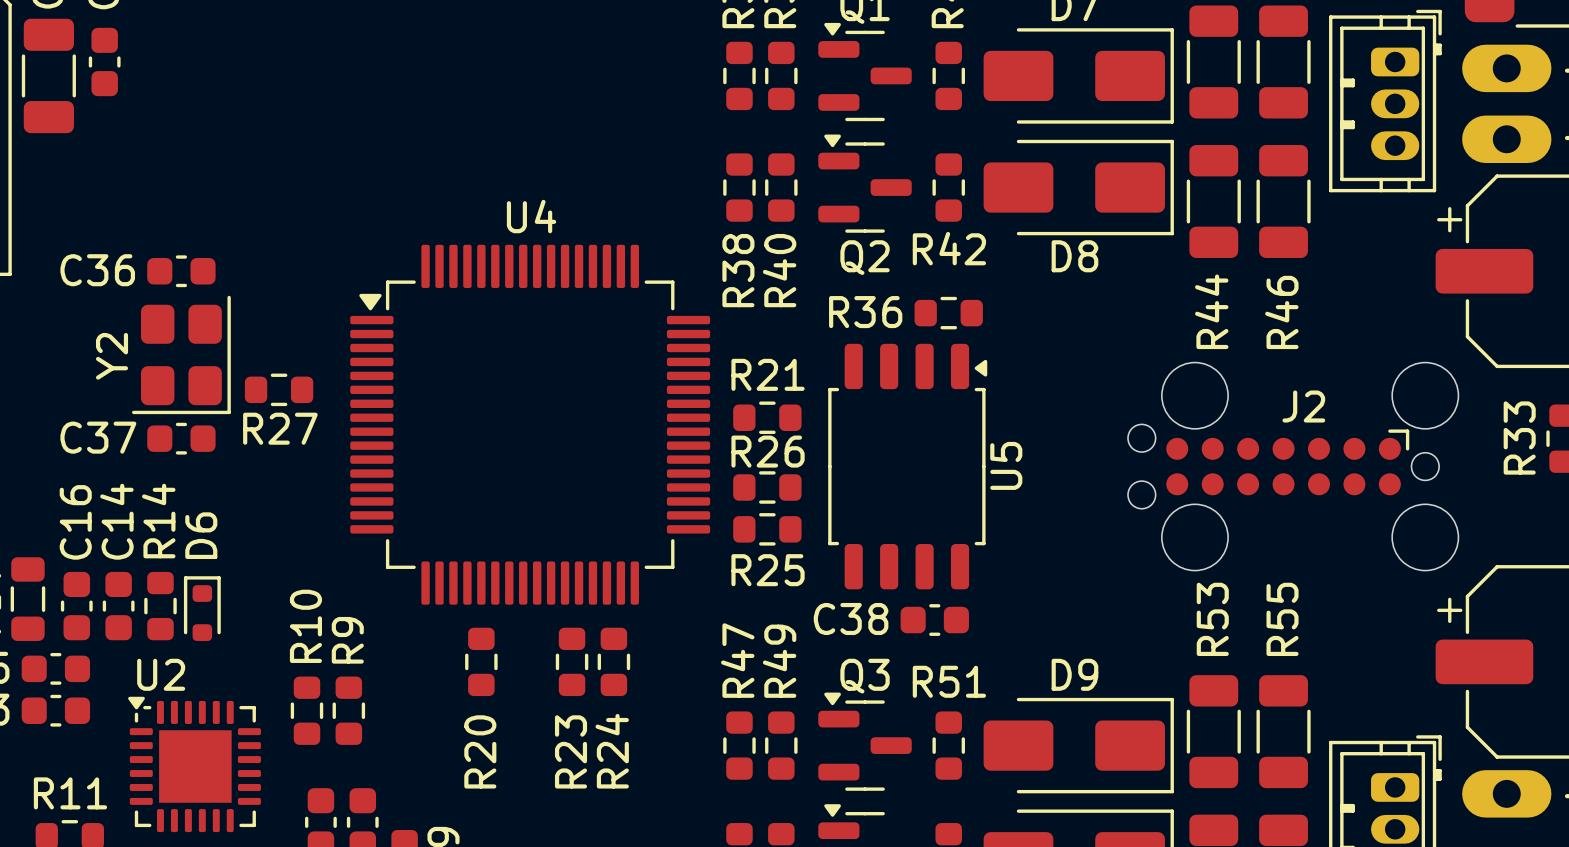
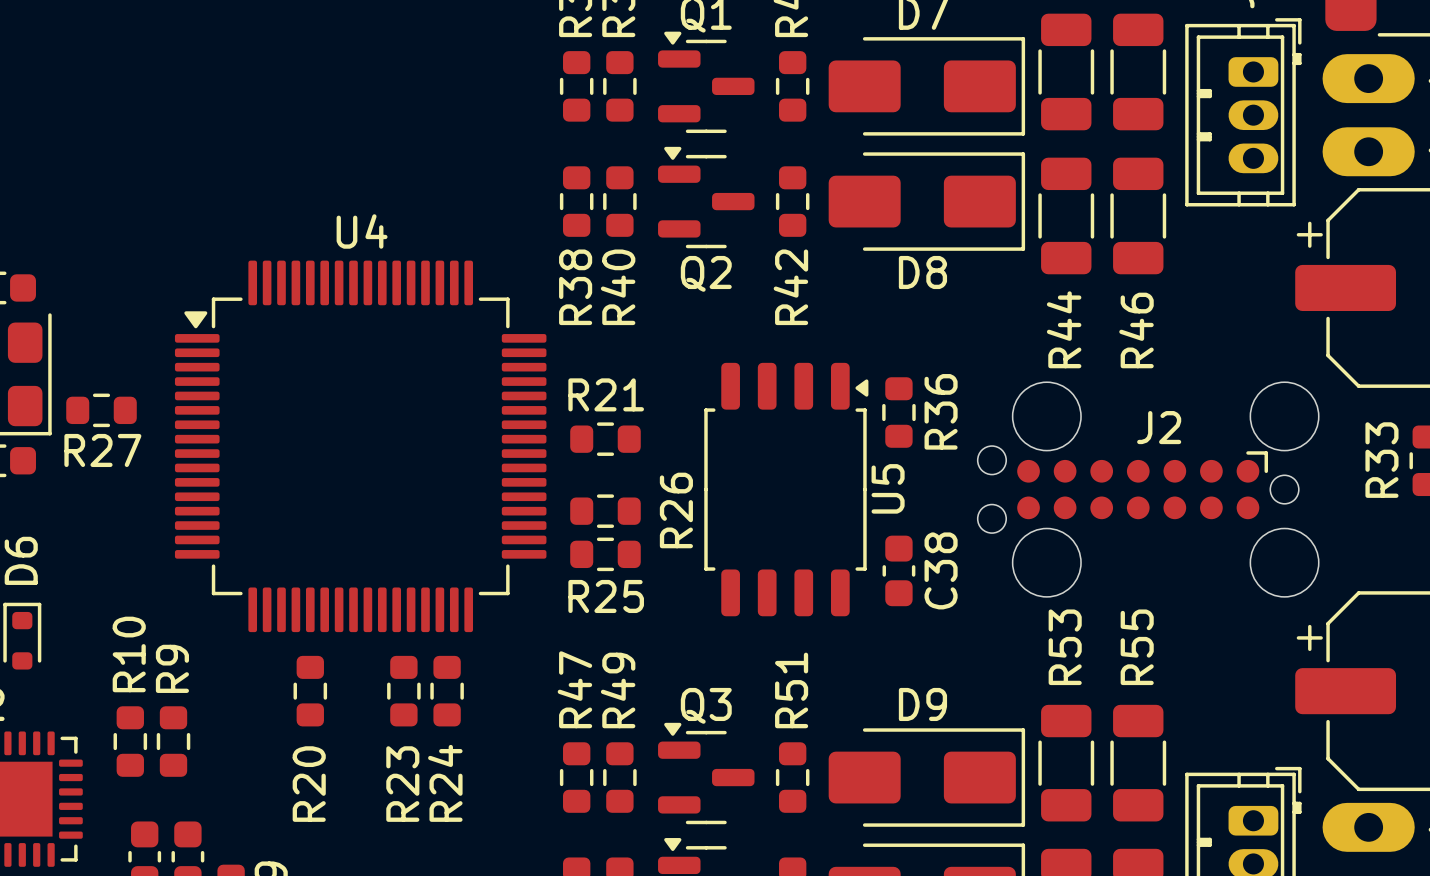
R42 name rotation: 0° (949, 248) -> 90° counterclockwise (790, 287)
R36 name position: R36 (865, 312) -> R36 (941, 411)
R36 rotation: 0° (948, 313) -> 90° clockwise (898, 412)
R36 position: (948, 313) -> (898, 412)
R26 name rotation: 0° (768, 451) -> 90° counterclockwise (676, 510)
U5 position: (907, 466) -> (786, 489)
C38 name position: C38 (851, 618) -> C38 (941, 570)
C38 rotation: 0° (934, 620) -> 90° clockwise (898, 570)
C38 position: (934, 620) -> (898, 570)
R51 name rotation: 0° (949, 681) -> 90° counterclockwise (791, 690)

